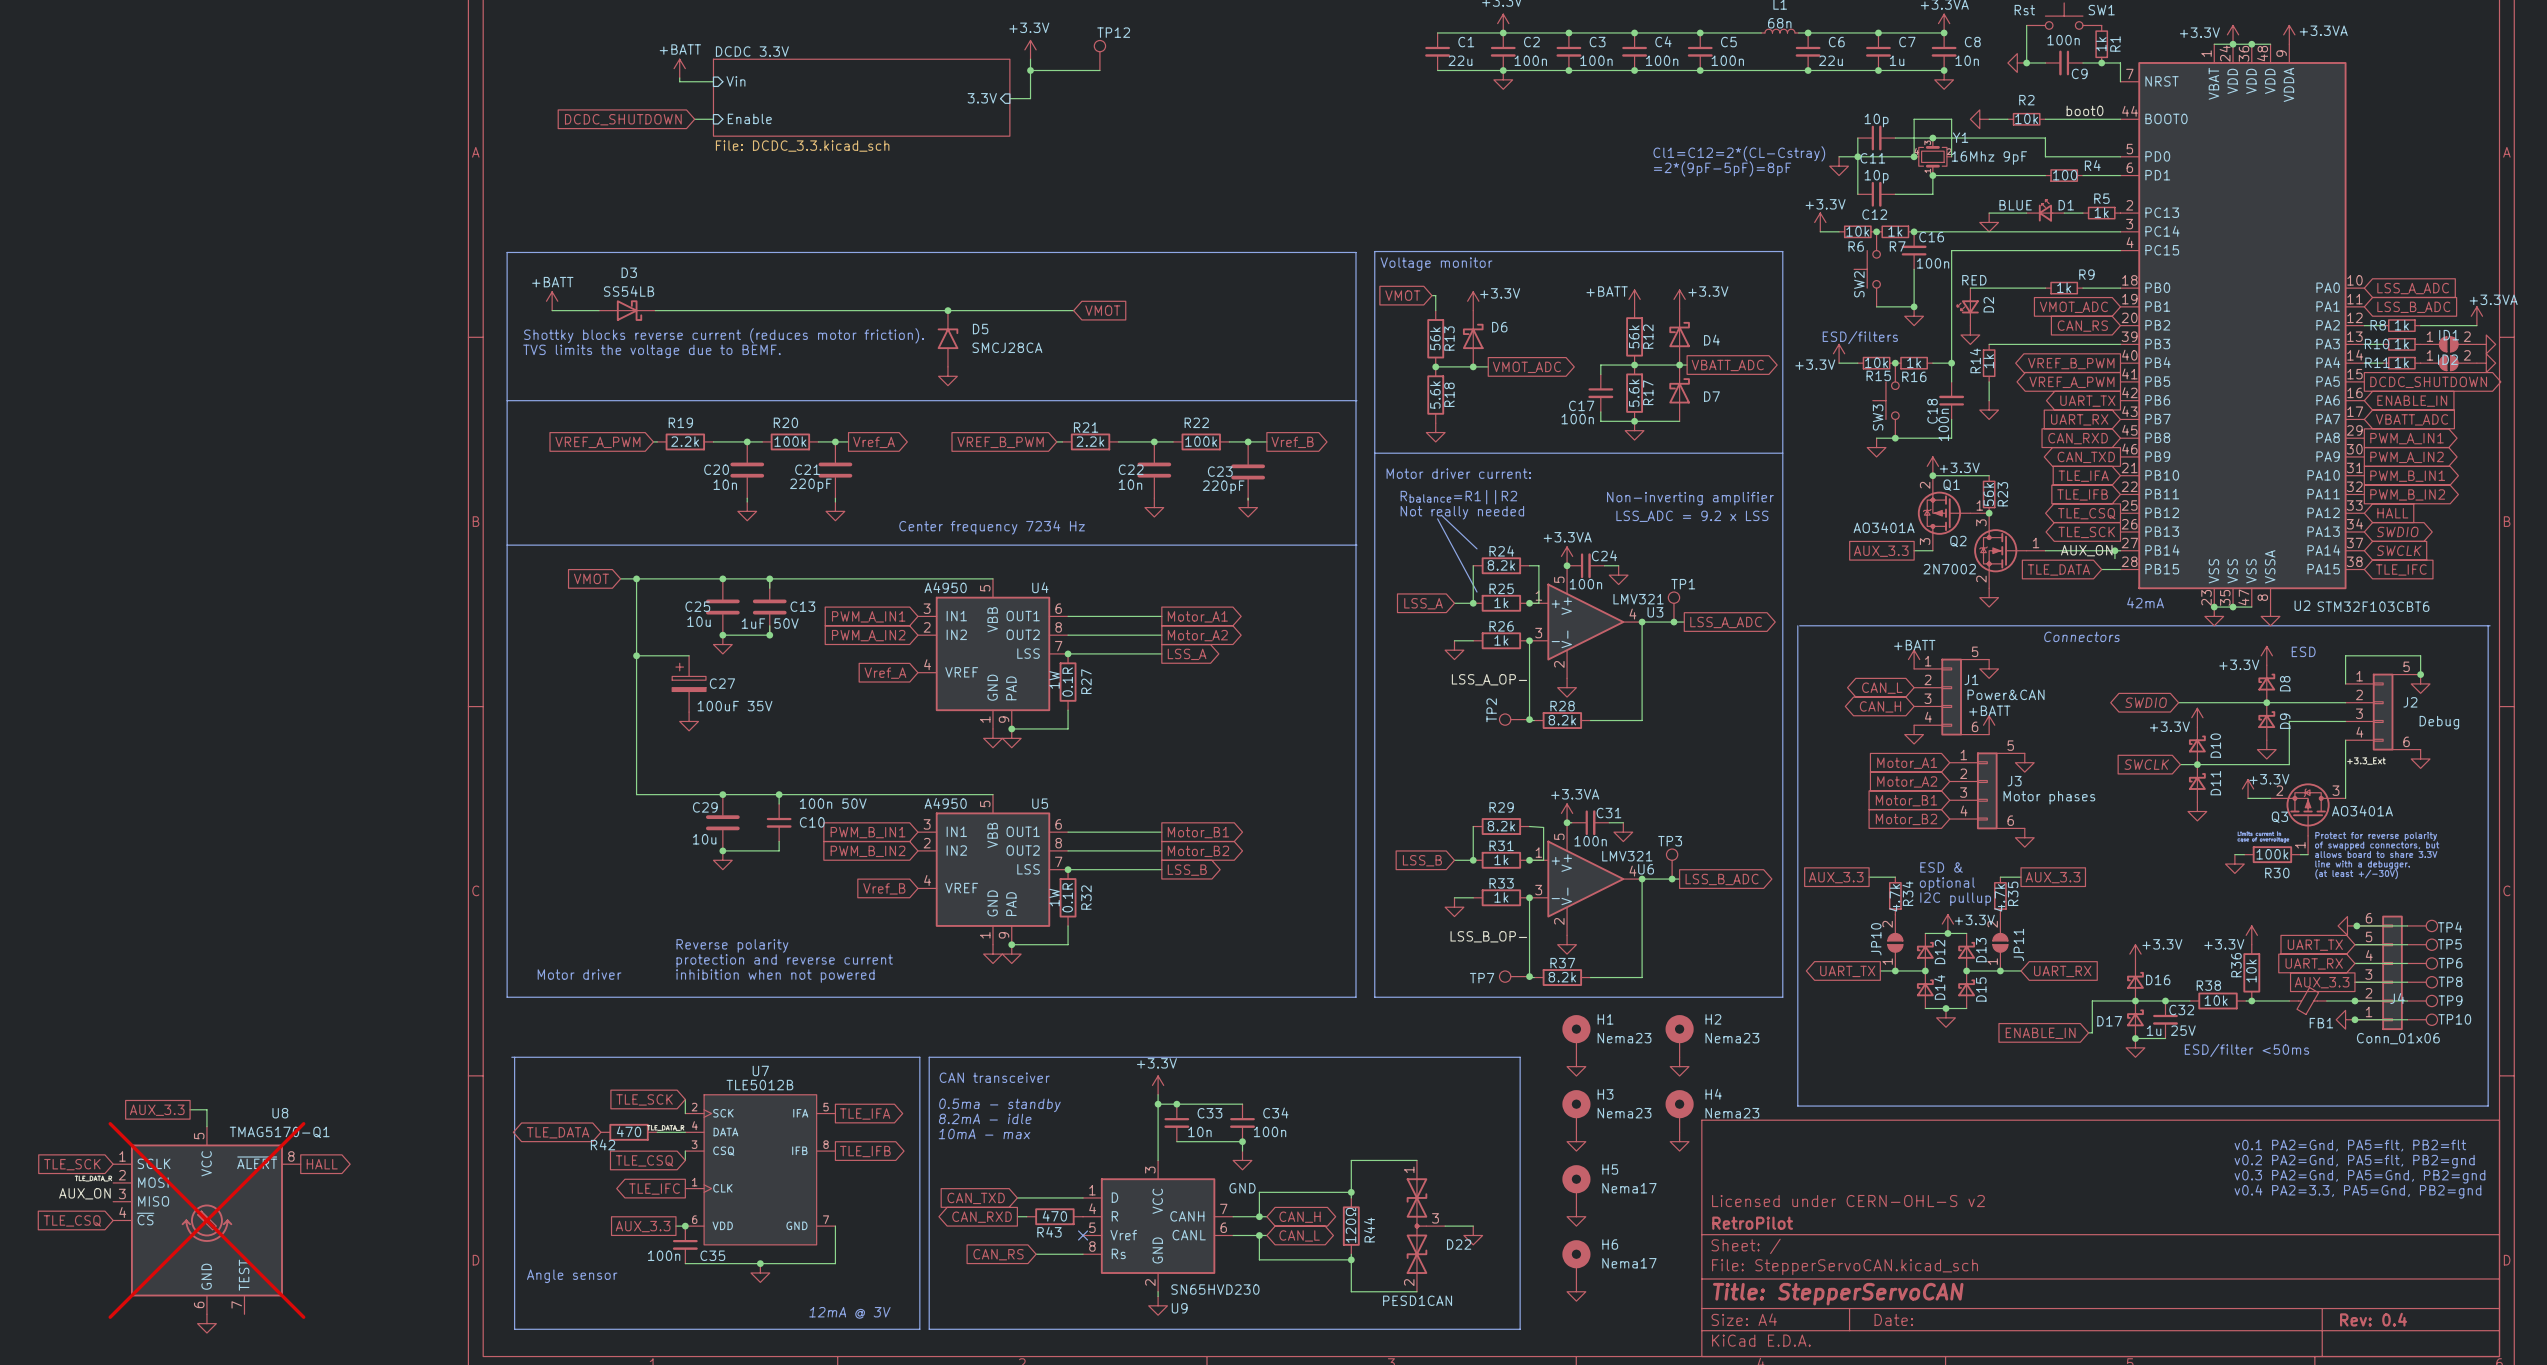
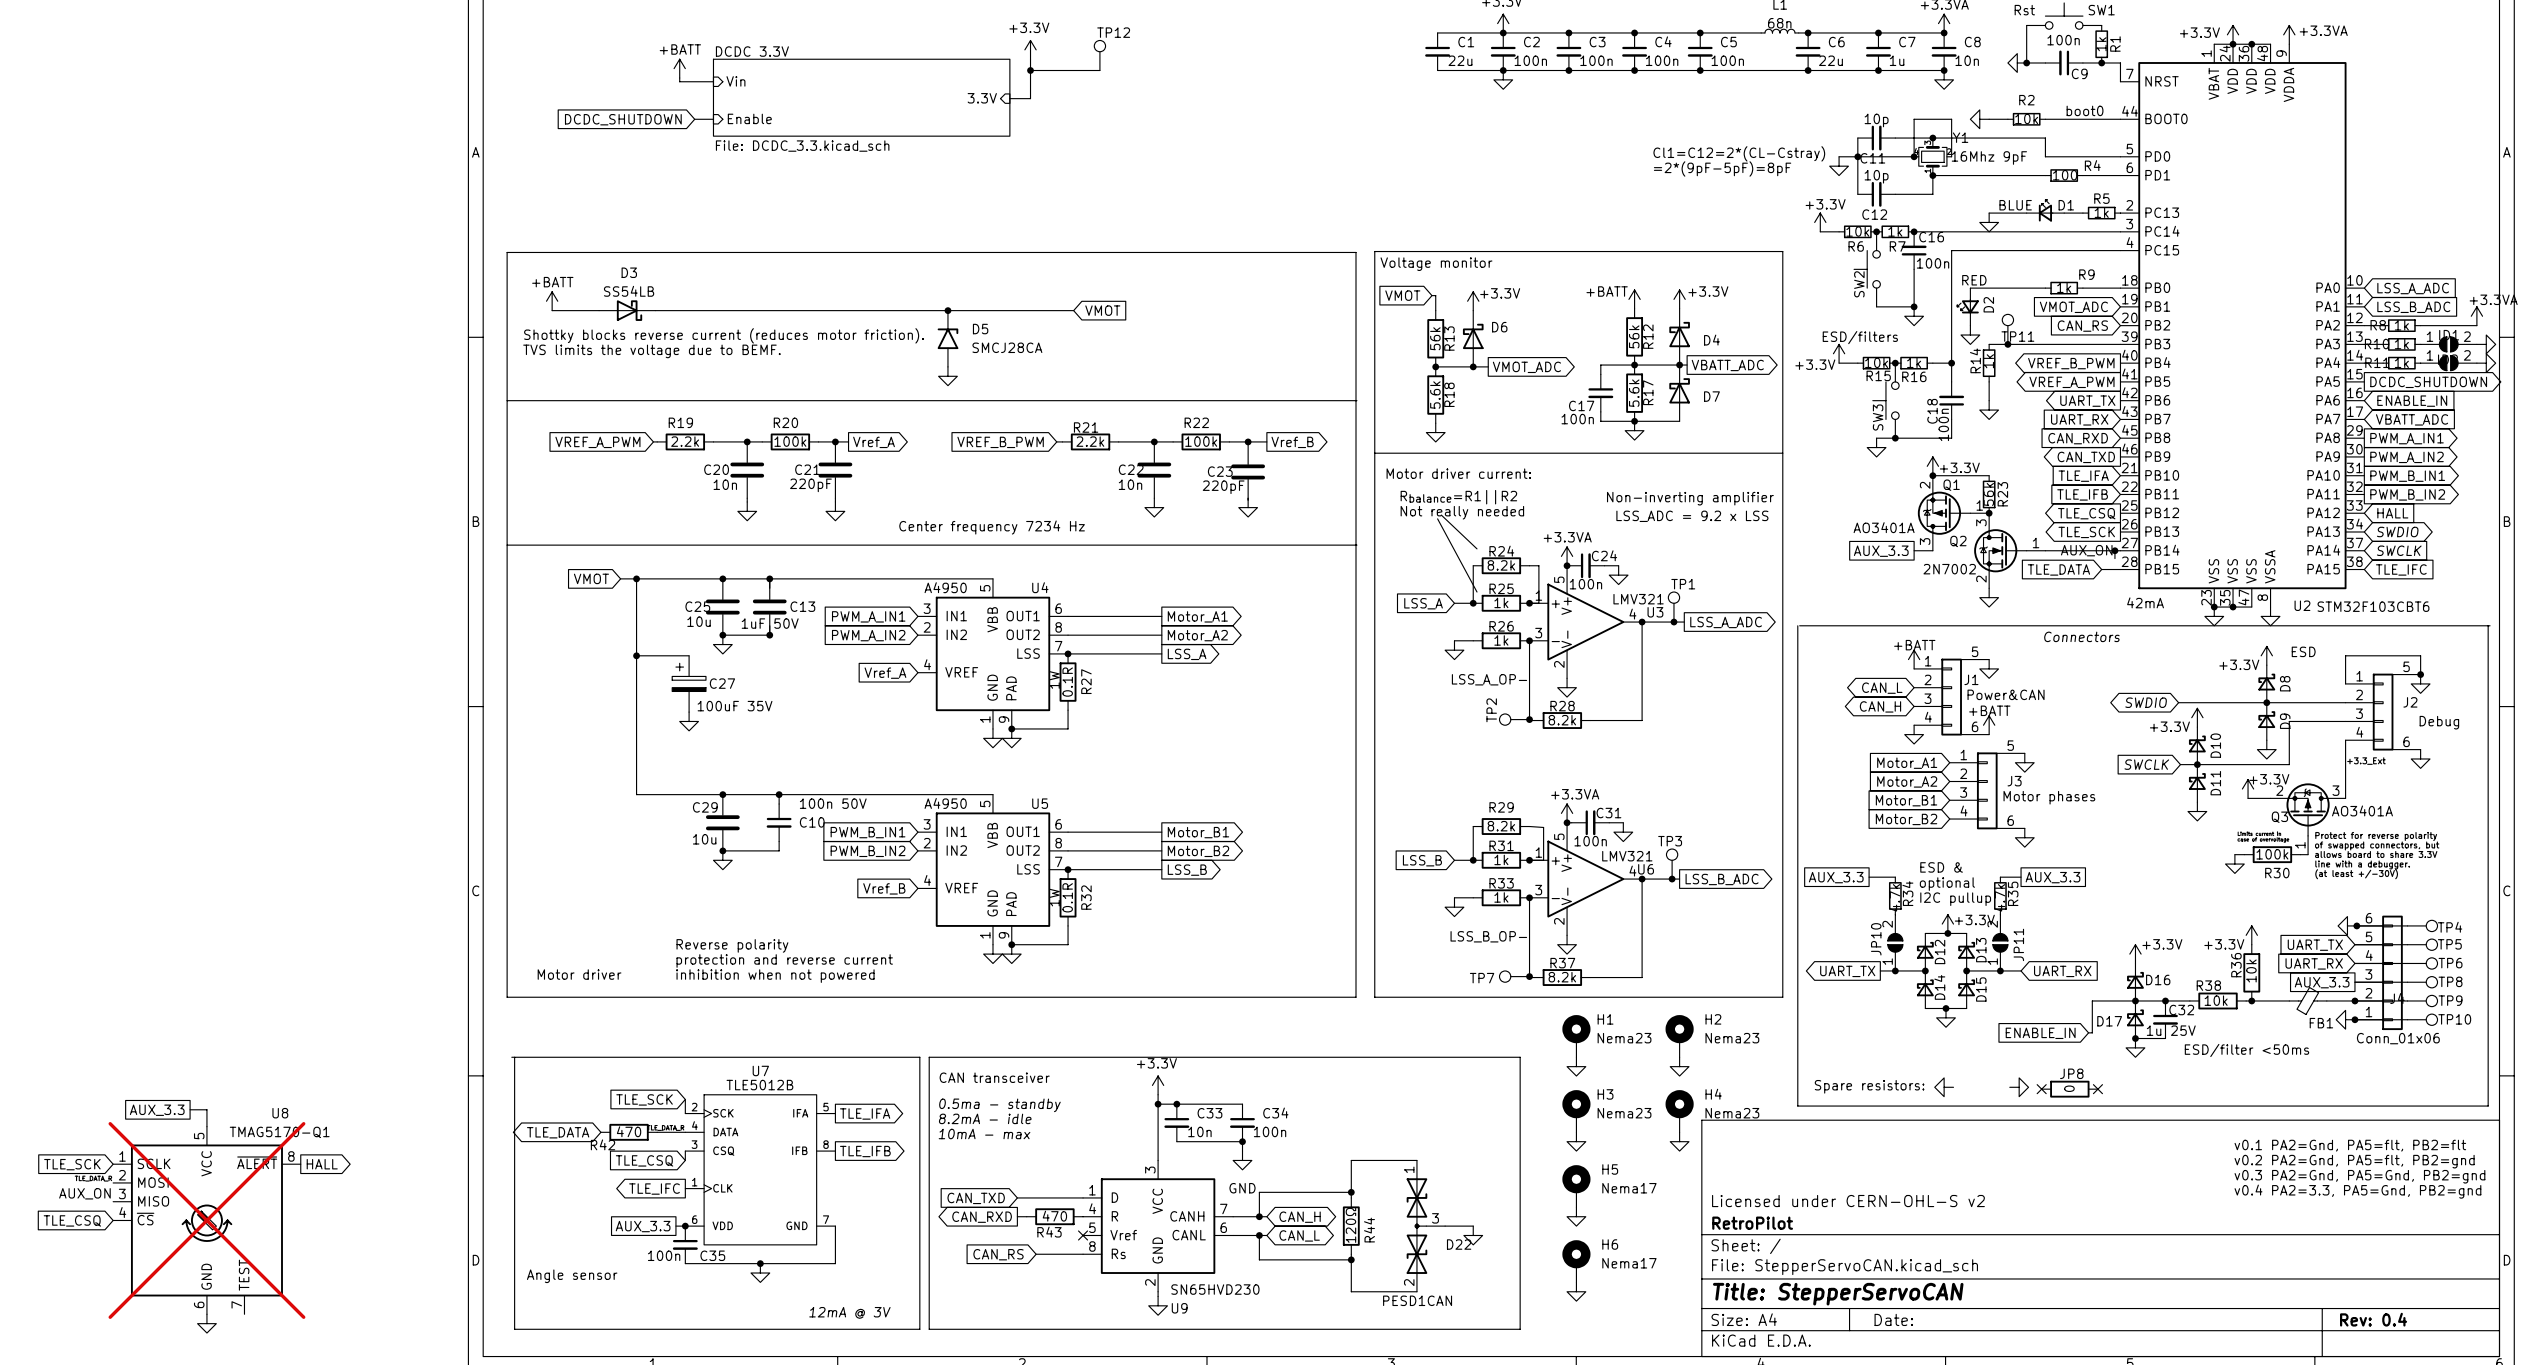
TP11: none -> (2007, 329)
junction: none -> (2007, 344)
text: none -> Spare resistors: (1869, 1086)
power symbol: none -> (1944, 1087)
power symbol: none -> (2019, 1087)
no-connect mark: none -> (2041, 1089)
JP8: none -> 0 (2069, 1089)
no-connect mark: none -> (2097, 1089)

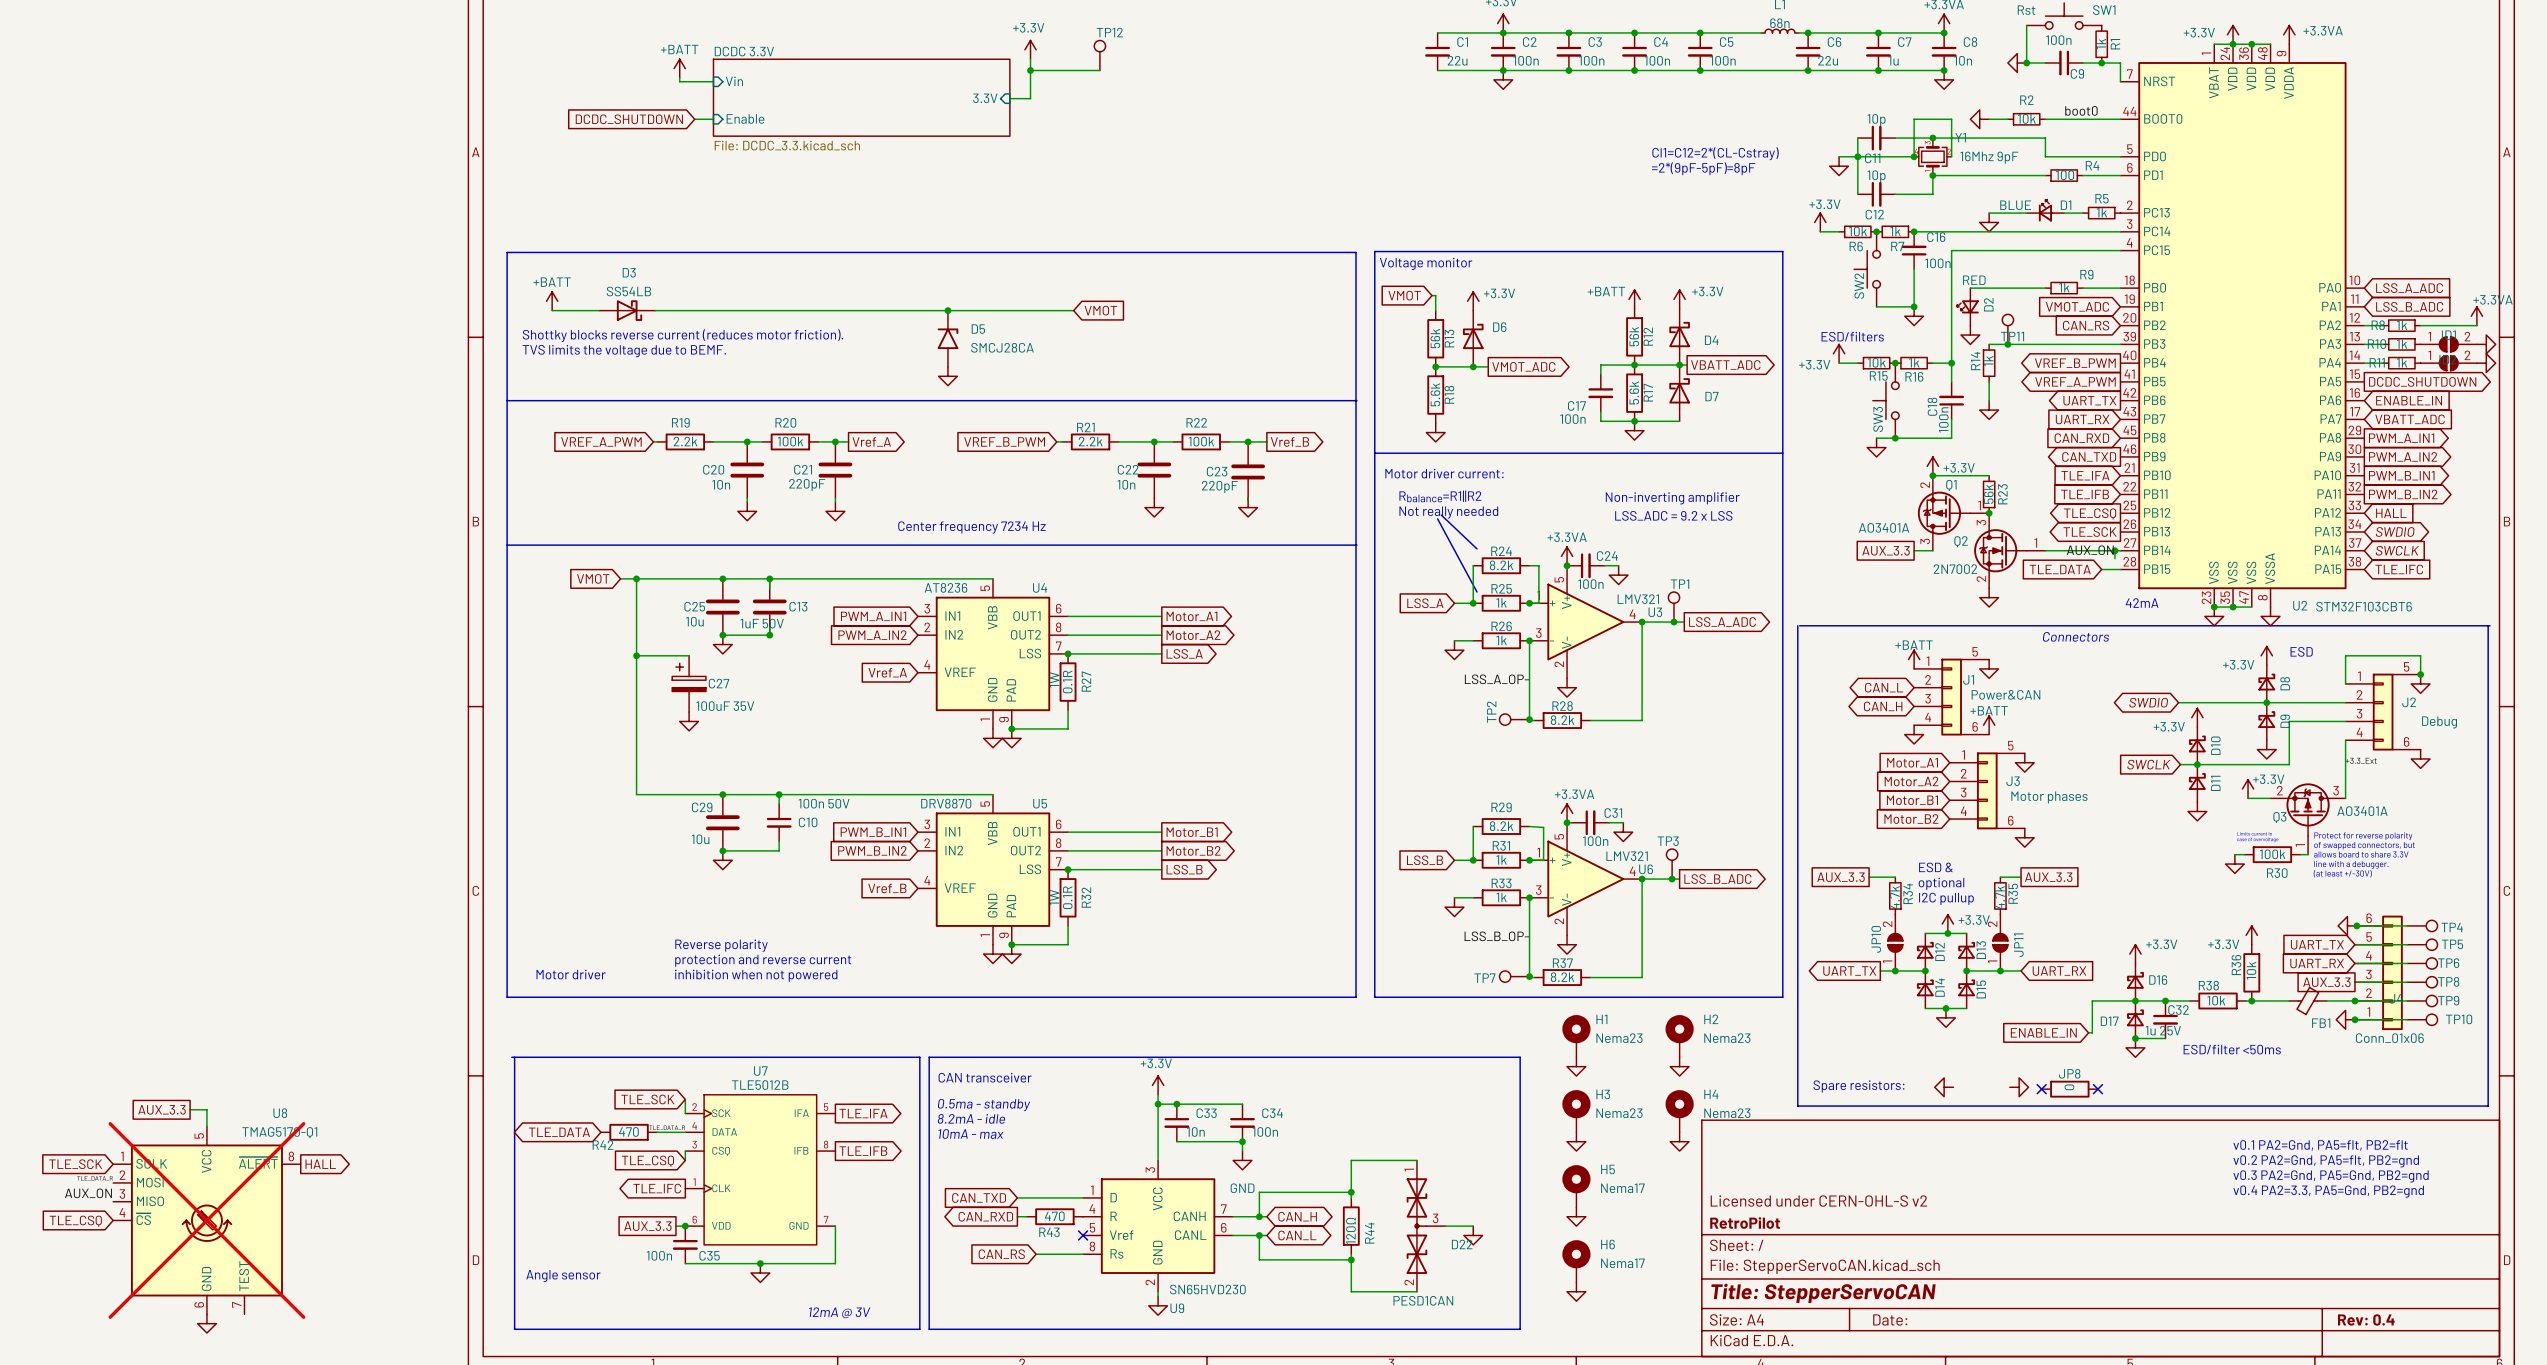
U4 value: A4950 (945, 587) -> AT8236 (945, 587)
U5 value: A4950 (945, 803) -> DRV8870 (946, 803)

